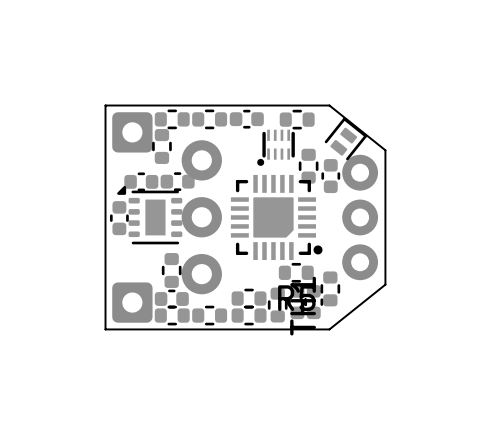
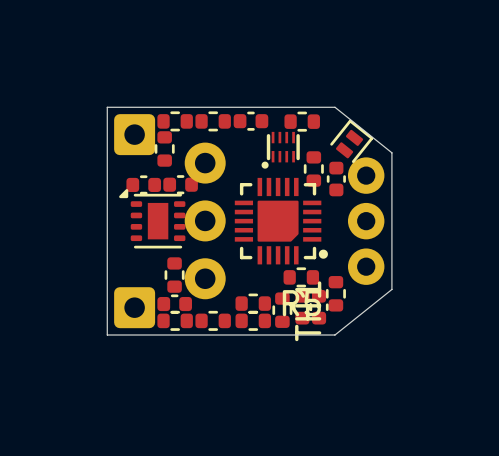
part: (119, 218) -> none

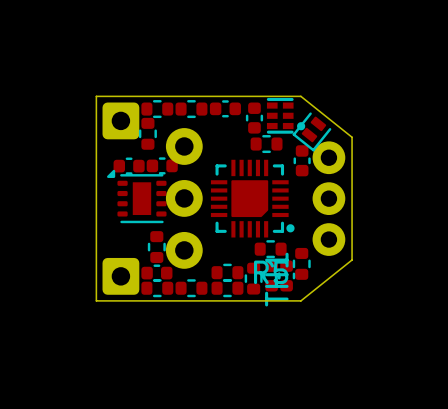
part: (302, 121) -> none
part: none -> (286, 115)
part: none -> (254, 118)
part rotation: 0° (351, 141) -> 180° (311, 131)
part: (280, 150) -> none
part rotation: 0° (313, 169) -> 90° clockwise (266, 144)

